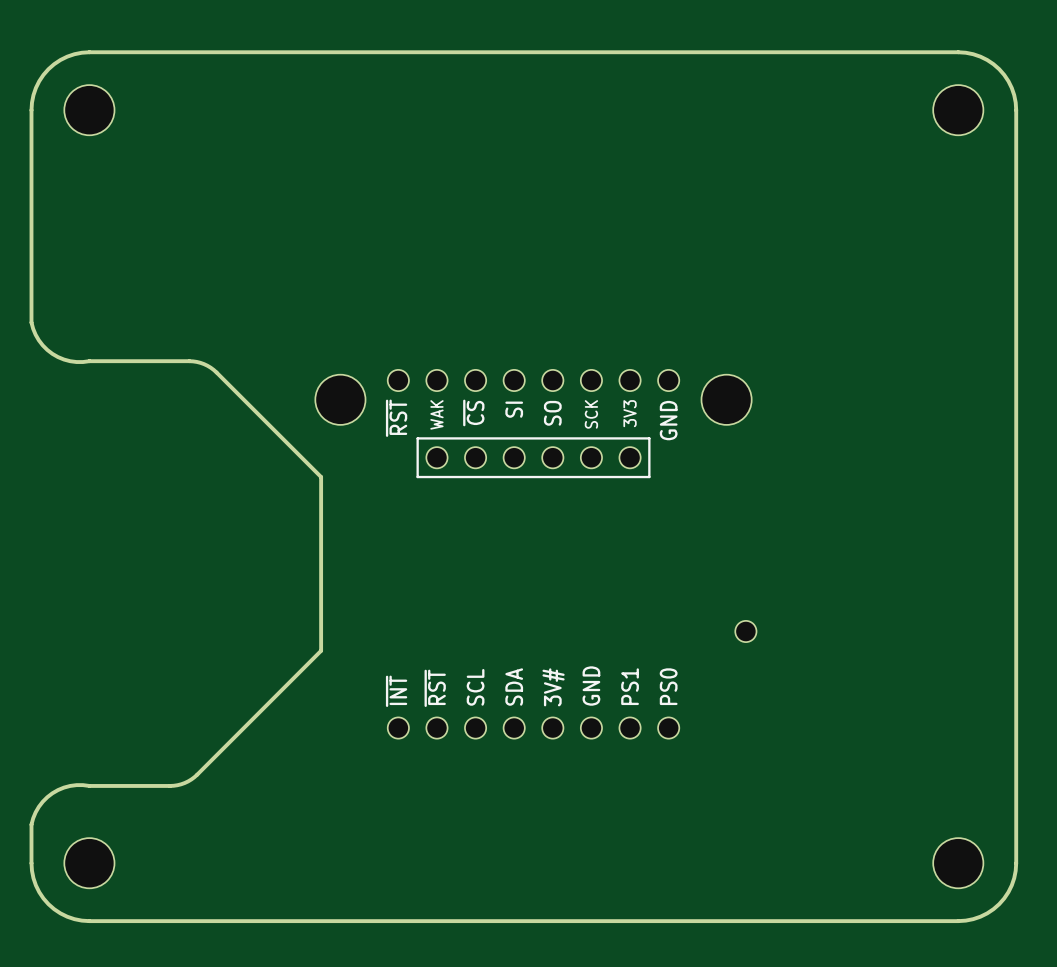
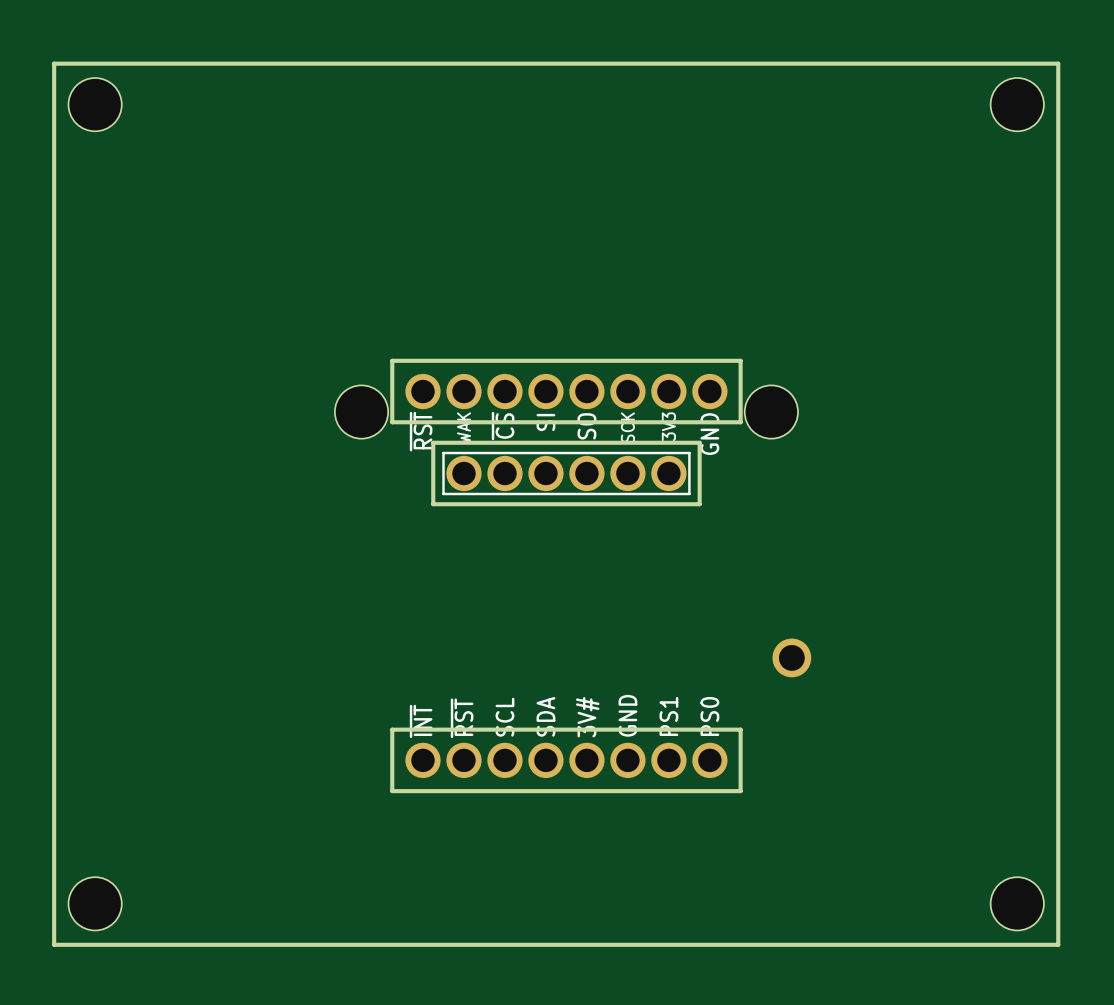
board edge: (958, 52) (89, 52) (67, 56) (48, 69) (35, 88) (31, 110) (31, 322) (38, 340) (52, 353) (70, 361) (189, 361) (207, 365) (216, 372) (321, 477) (321, 650) (197, 774) (188, 781) (169, 785) (76, 785) (58, 790) (47, 797) (35, 812) (31, 824) (31, 863) (35, 885) (48, 904) (67, 916) (89, 921) (958, 921) (980, 916) (999, 904) (1011, 885) (1016, 863) (1016, 110) (1011, 88) (999, 69) (980, 56) (958, 52) -> (1058, 63) (1058, 944) (54, 944) (54, 63) (1058, 63)
board edge: none -> (740, 360) (392, 360) (392, 422) (740, 422) (740, 360)
hole: (398, 380) -> none
part: none -> (423, 391)
hole: (436, 380) -> none
part: none -> (463, 391)
hole: (475, 380) -> none
part: none -> (504, 391)
hole: (514, 380) -> none
part: none -> (545, 391)
hole: (552, 380) -> none
part: none -> (586, 391)
hole: (591, 380) -> none
part: none -> (627, 391)
hole: (630, 380) -> none
part: none -> (668, 391)
hole: (668, 380) -> none
part: none -> (709, 391)
board edge: none -> (699, 442) (433, 442) (433, 504) (699, 504) (699, 442)
hole: (436, 457) -> none
part: none -> (463, 473)
hole: (475, 457) -> none
part: none -> (504, 473)
hole: (514, 457) -> none
part: none -> (545, 473)
hole: (552, 457) -> none
part: none -> (586, 473)
hole: (591, 457) -> none
part: none -> (627, 473)
hole: (630, 457) -> none
part: none -> (668, 473)
hole: (745, 631) -> none
part: none -> (791, 657)
board edge: none -> (740, 729) (392, 729) (392, 791) (740, 791) (740, 729)
hole: (398, 728) -> none
part: none -> (423, 760)
hole: (436, 728) -> none
part: none -> (463, 760)
hole: (475, 728) -> none
part: none -> (504, 760)
hole: (514, 728) -> none
part: none -> (545, 760)
hole: (552, 728) -> none
part: none -> (586, 760)
hole: (591, 728) -> none
part: none -> (627, 760)
hole: (630, 728) -> none
part: none -> (668, 760)
hole: (668, 728) -> none
part: none -> (709, 760)

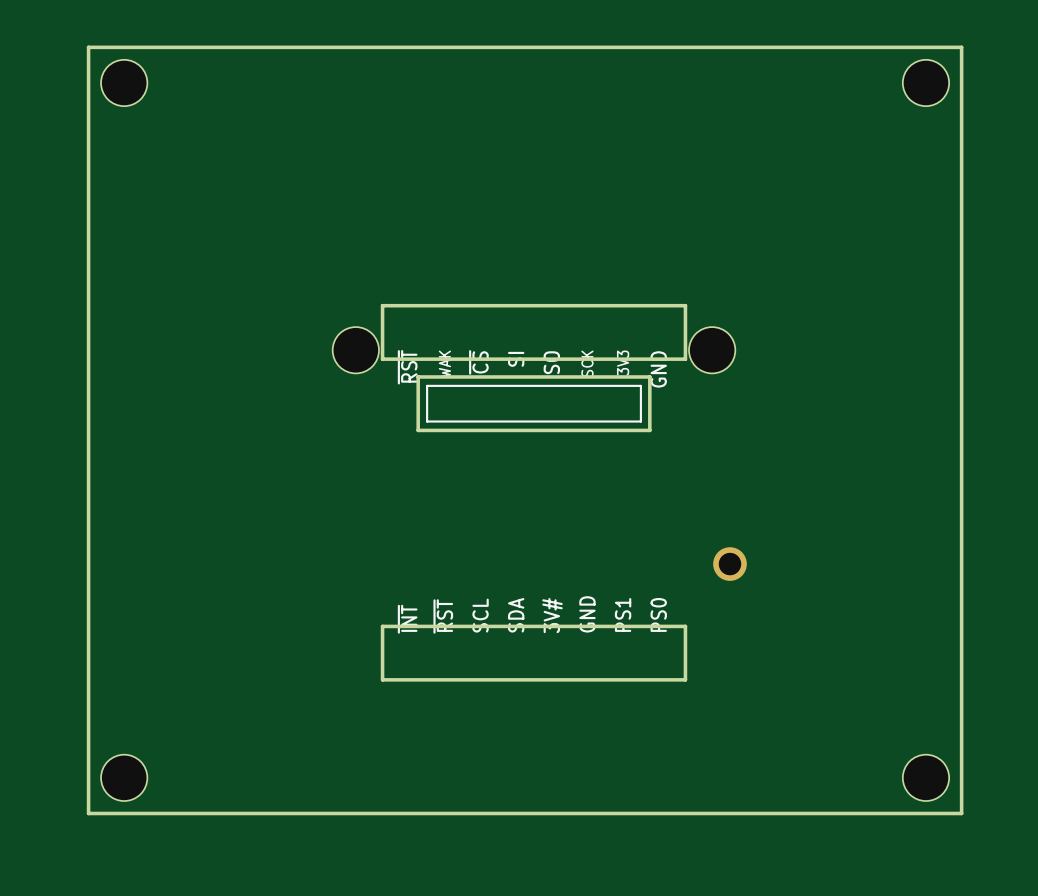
part: (423, 391) -> none
part: (463, 391) -> none
part: (504, 391) -> none
part: (545, 391) -> none
part: (586, 391) -> none
part: (627, 391) -> none
part: (668, 391) -> none
part: (709, 391) -> none
part: (463, 473) -> none
part: (504, 473) -> none
part: (545, 473) -> none
part: (586, 473) -> none
part: (627, 473) -> none
part: (668, 473) -> none
part: (423, 760) -> none
part: (463, 760) -> none
part: (504, 760) -> none
part: (545, 760) -> none
part: (586, 760) -> none
part: (627, 760) -> none
part: (668, 760) -> none
part: (709, 760) -> none

